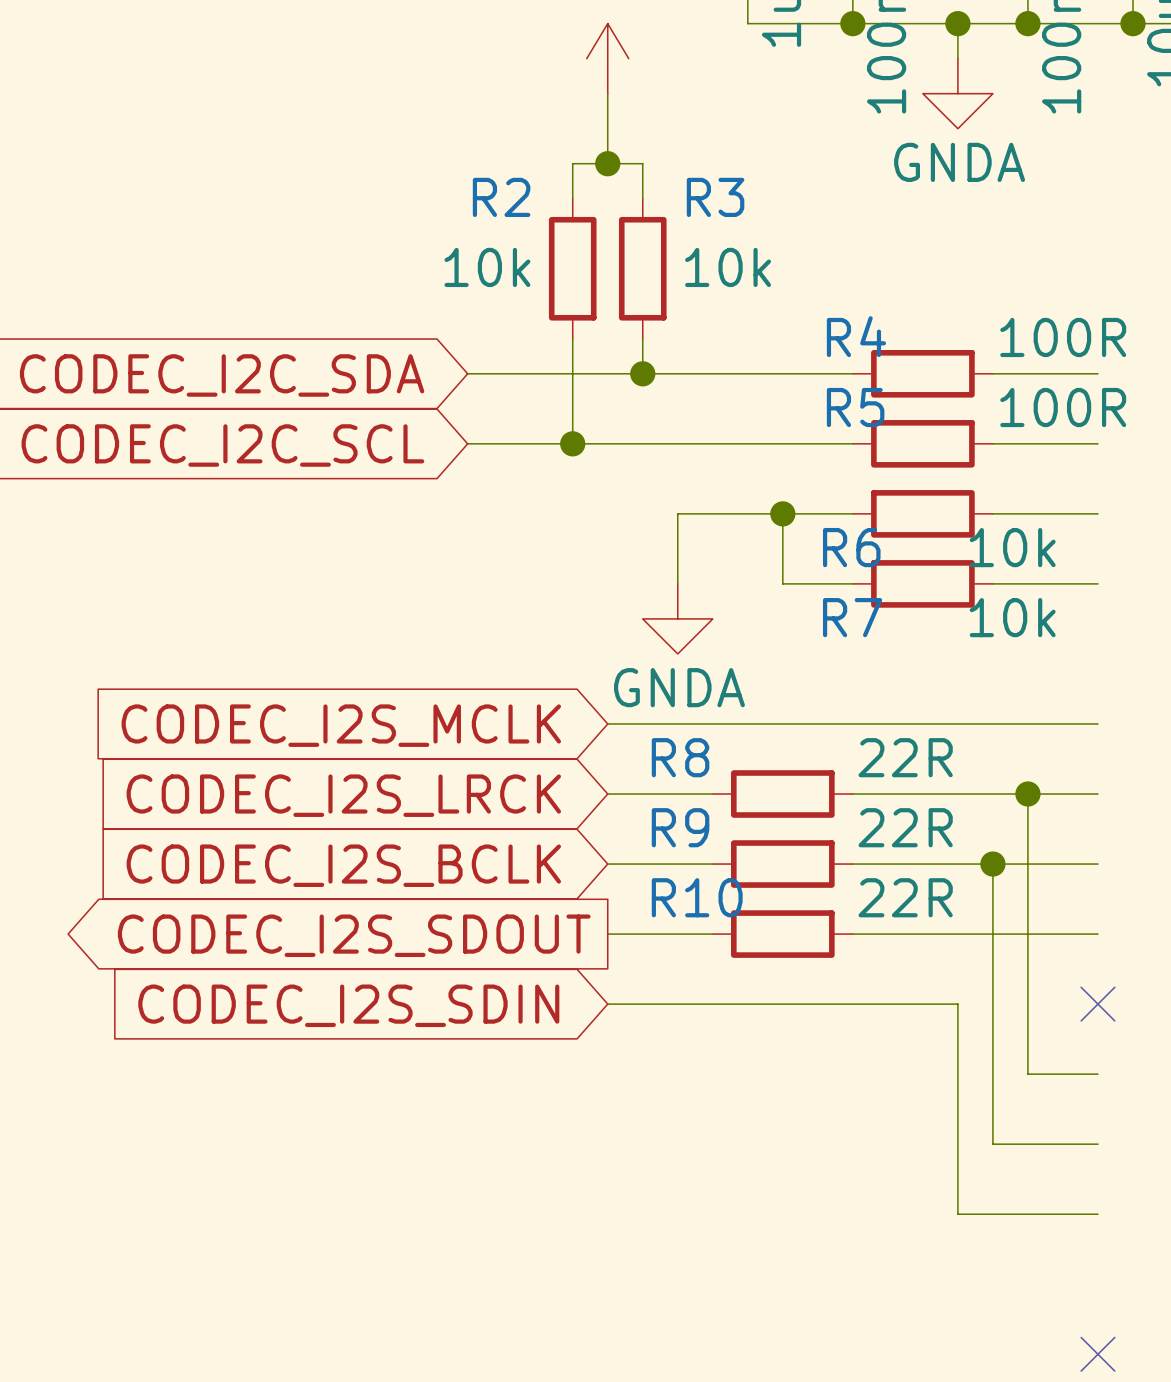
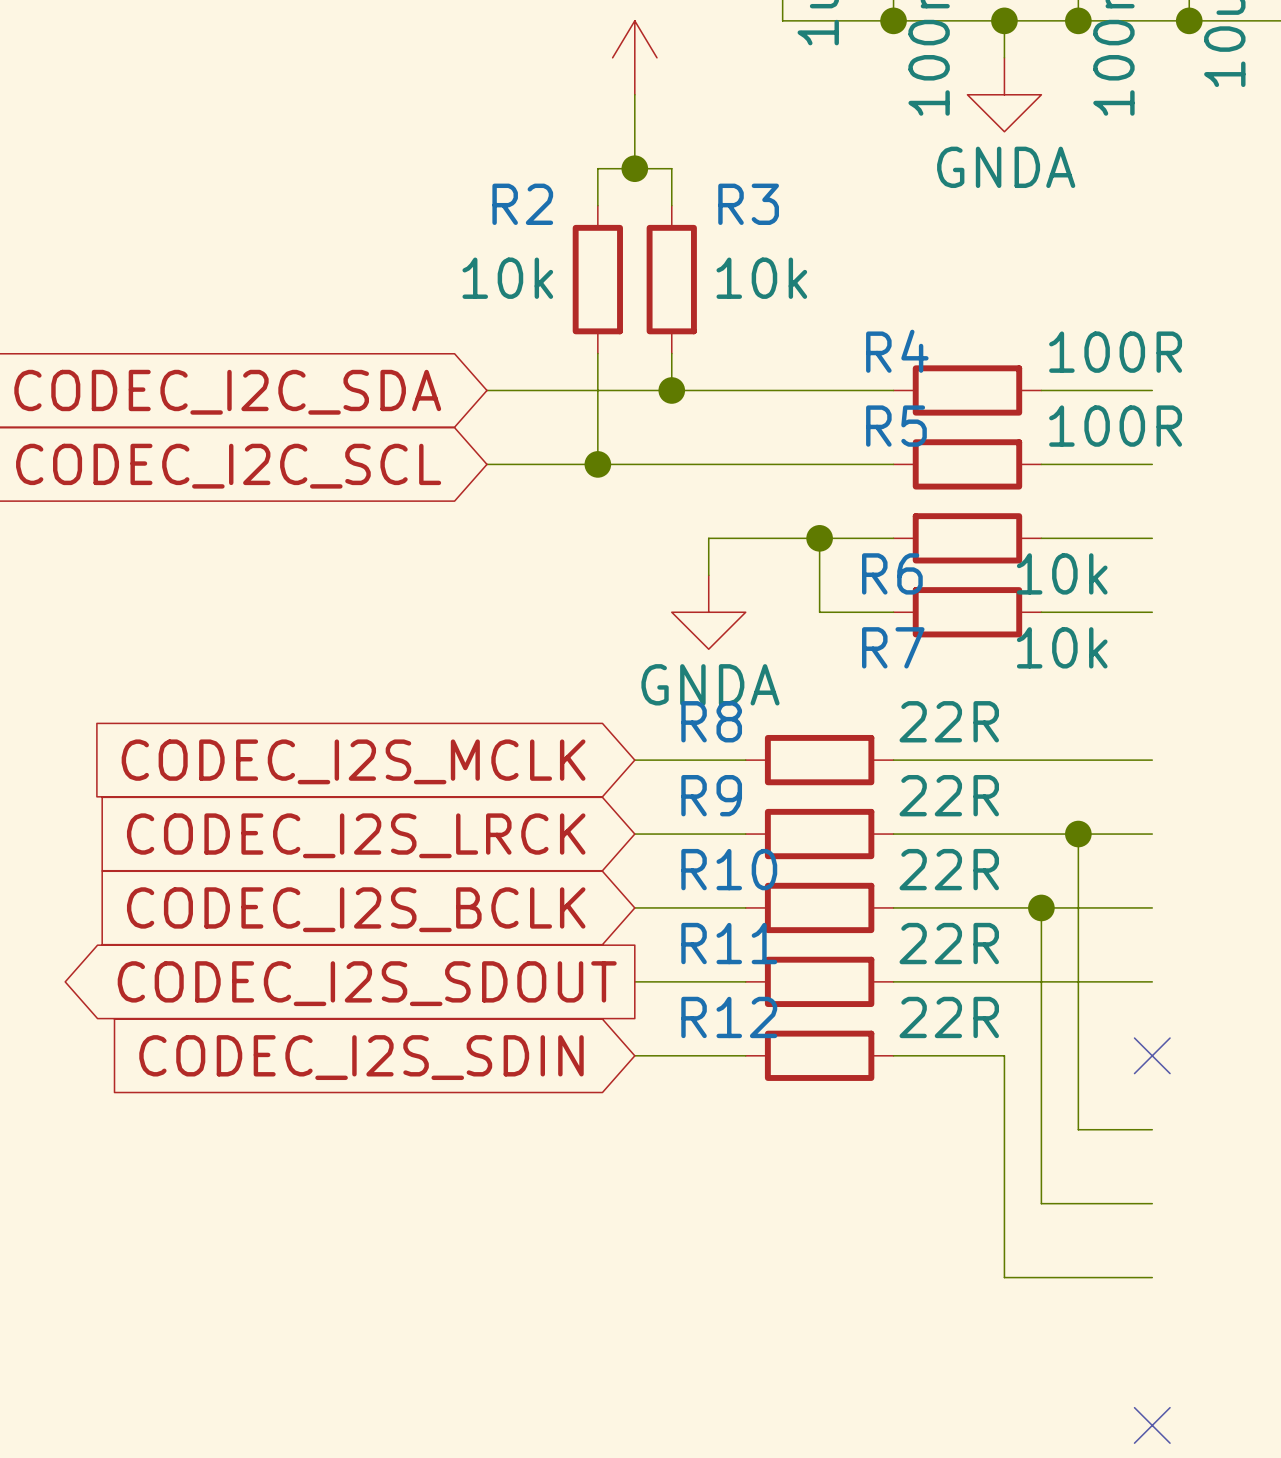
power symbol position: GNDA (677, 618) -> GNDA (708, 612)
wire: (712, 723) (852, 723) -> none
R8: none -> 22R (819, 760)
R8 name: R8 (680, 757) -> R9 (711, 795)
R9 name: R9 (680, 827) -> R10 (729, 869)
R10 name: R10 (697, 897) -> R11 (729, 943)
wire: (712, 1004) (852, 1004) -> none
R12: none -> 22R (819, 1055)

